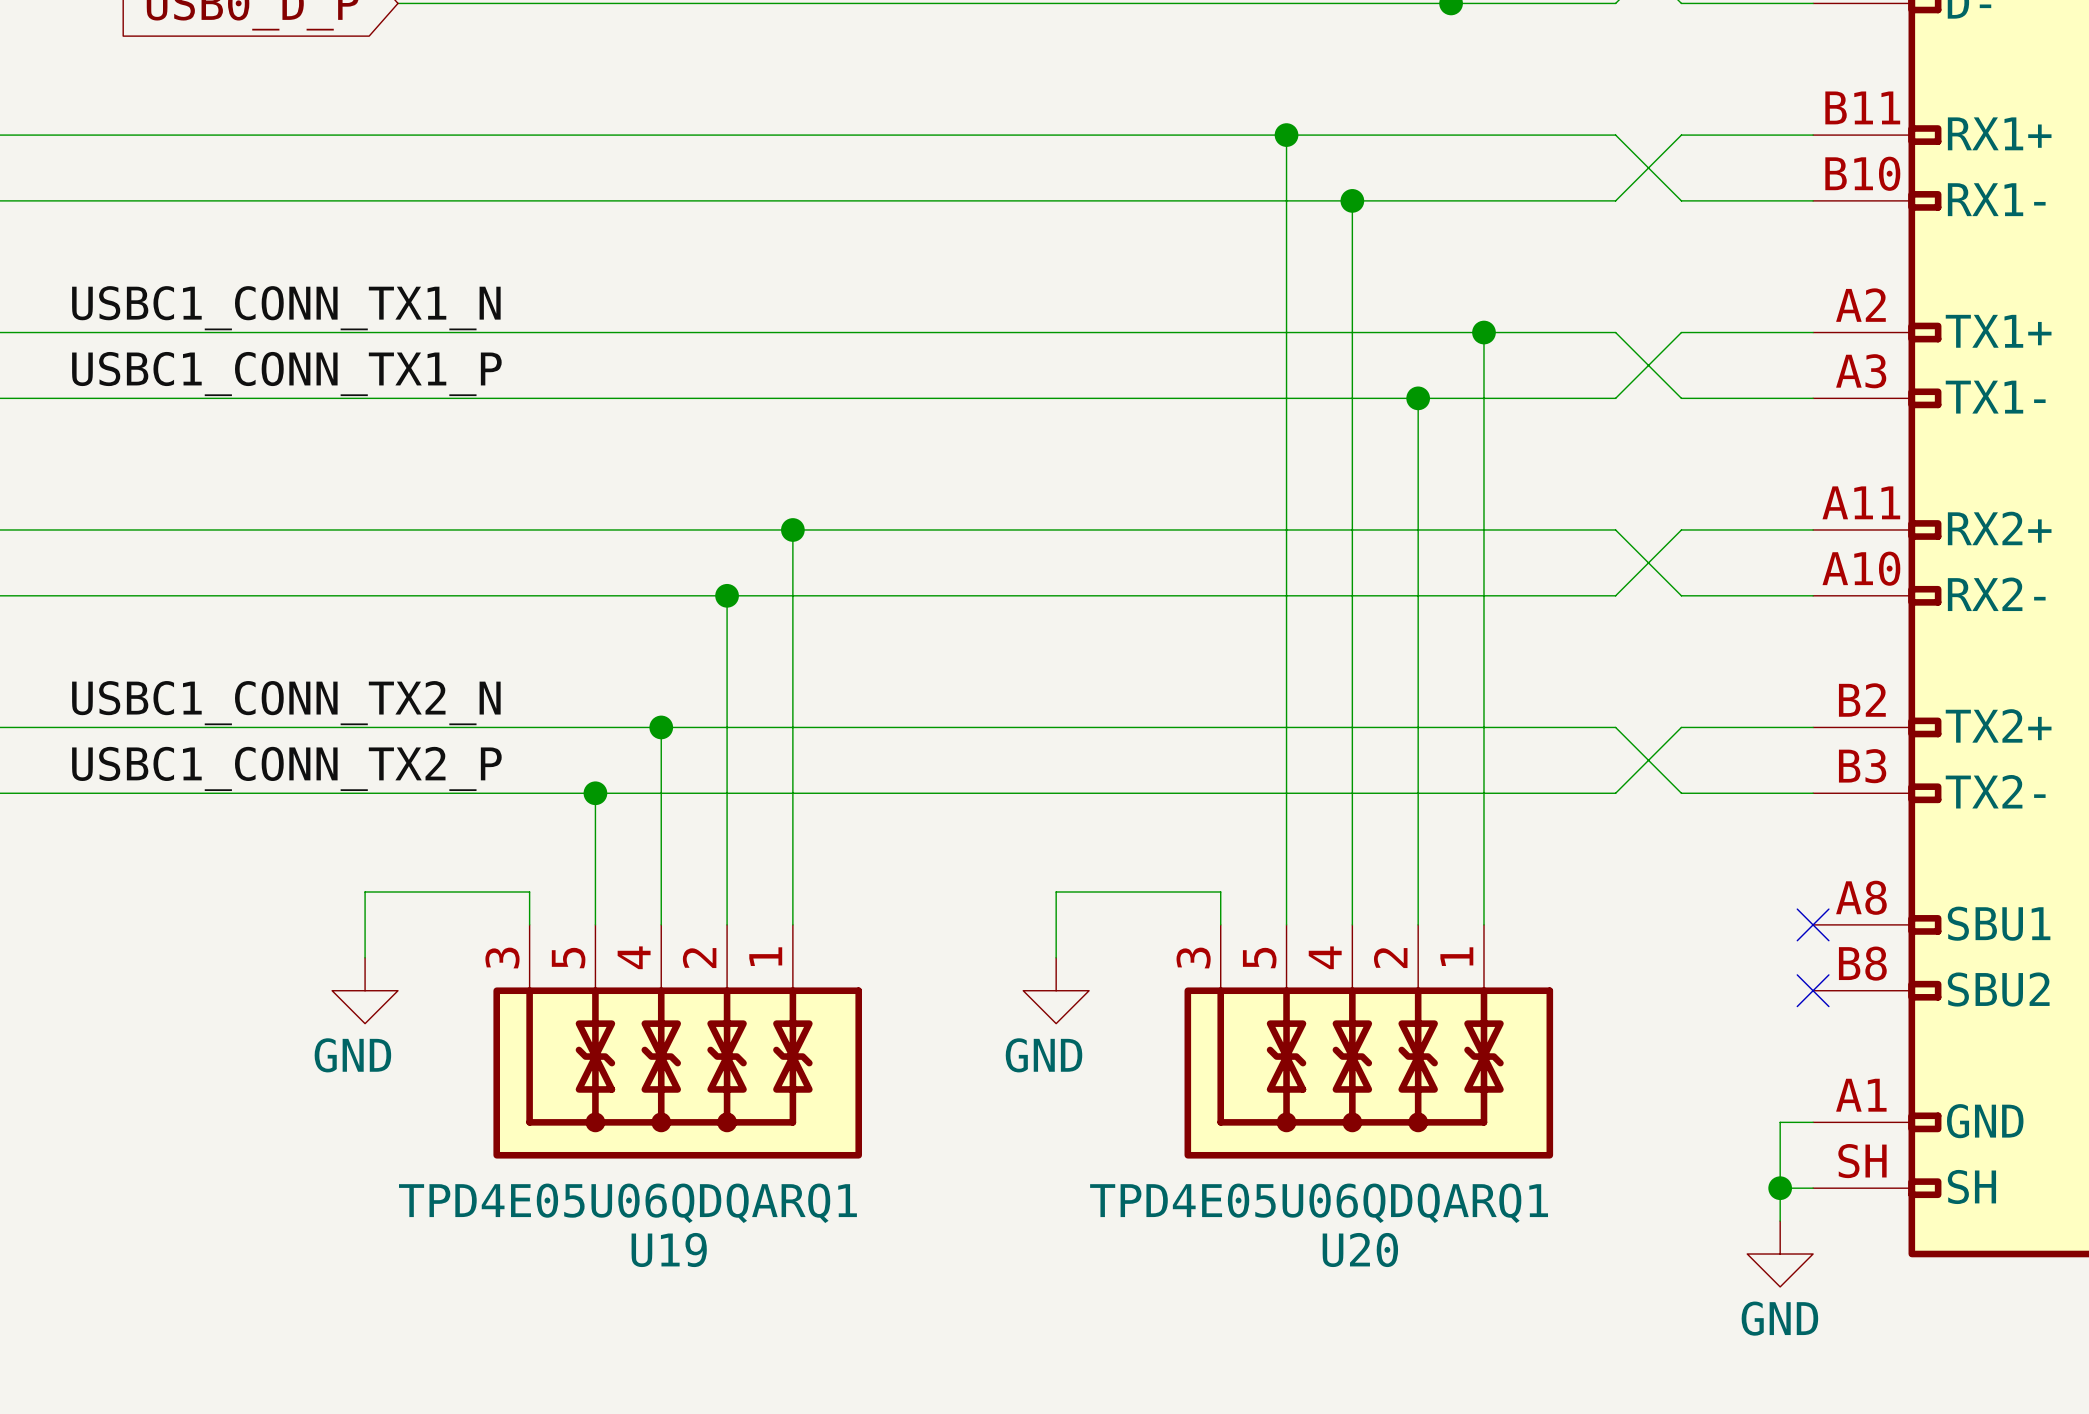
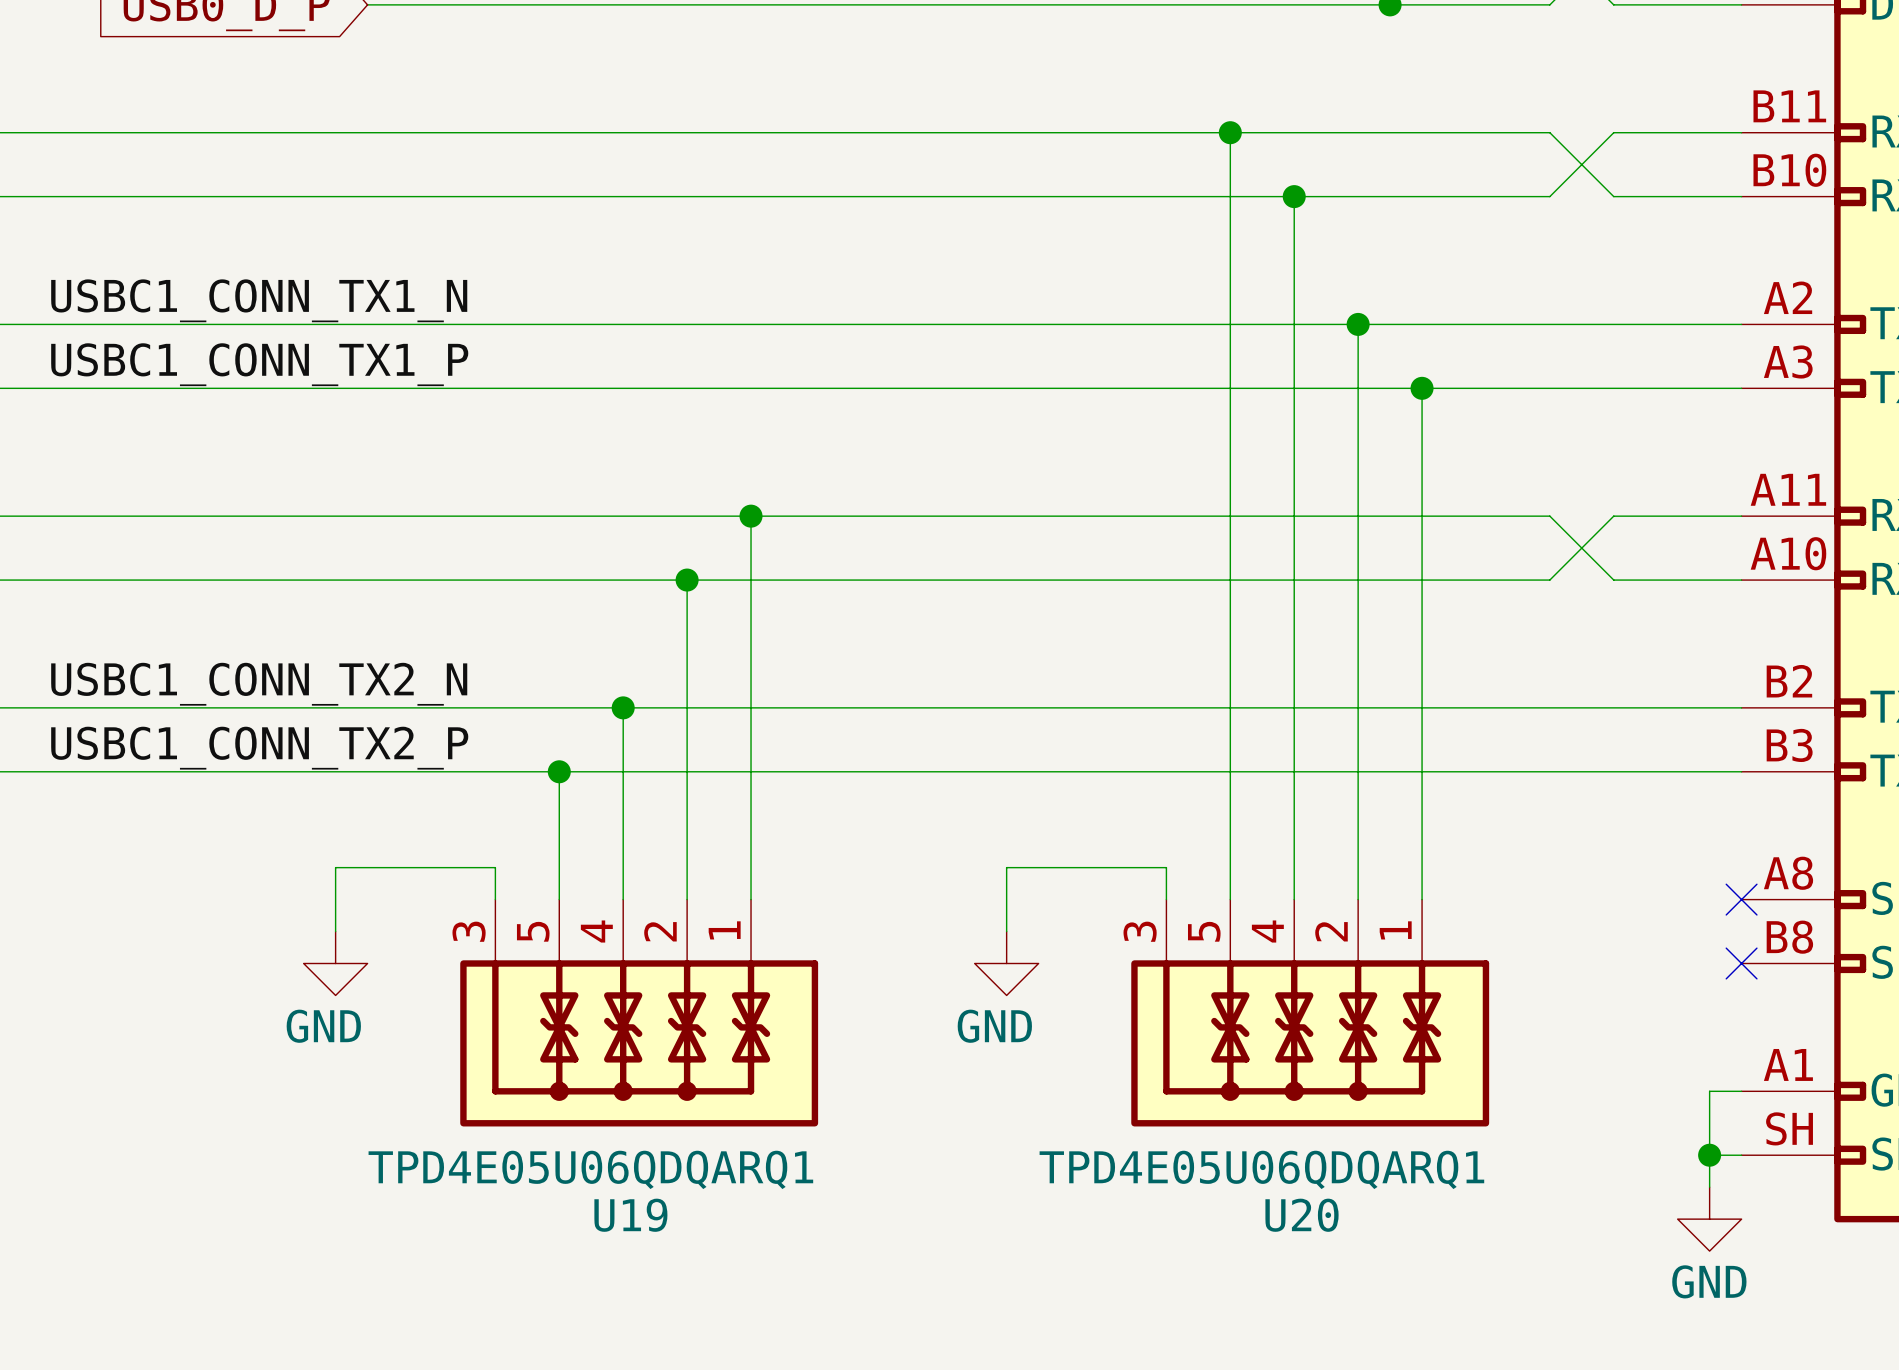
junction: none -> (1358, 324)
wire: (1483, 332) (1483, 398) -> (1358, 324) (1358, 388)
junction: (1483, 332) -> none
wire: (1615, 332) (1681, 398) -> (1549, 324) (1613, 324)
wire: (1681, 332) (1615, 398) -> (1613, 388) (1549, 388)
junction: (1418, 398) -> none
junction: none -> (1422, 388)
wire: (1615, 727) (1681, 793) -> (1549, 707) (1613, 707)
wire: (1681, 727) (1615, 793) -> (1613, 771) (1549, 771)

